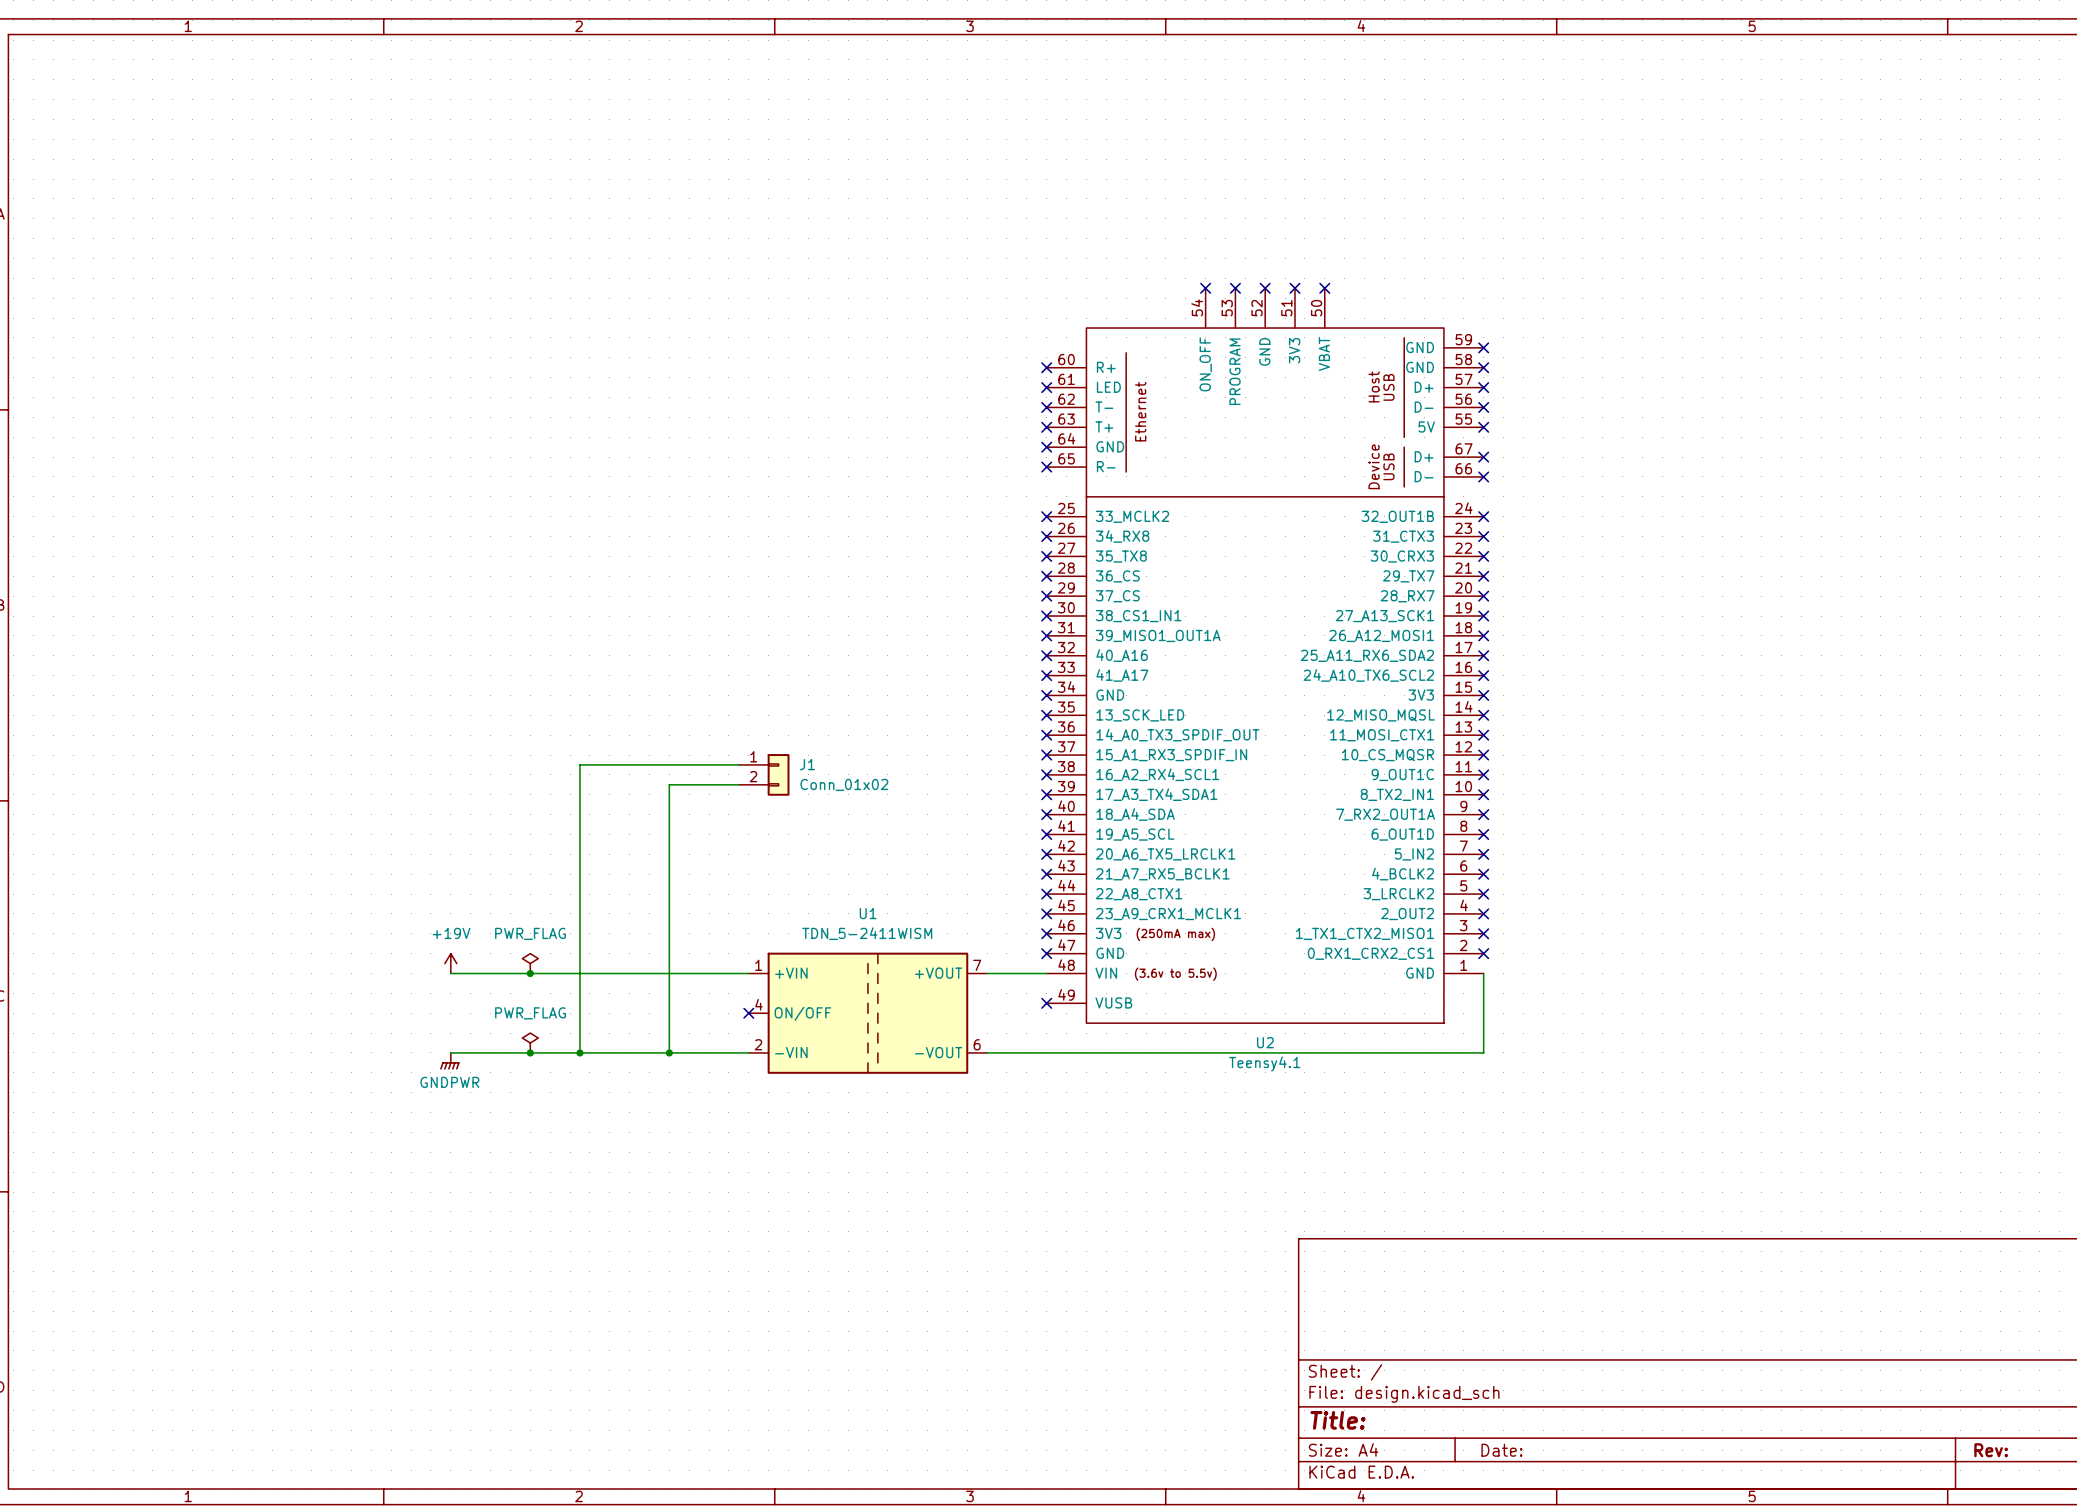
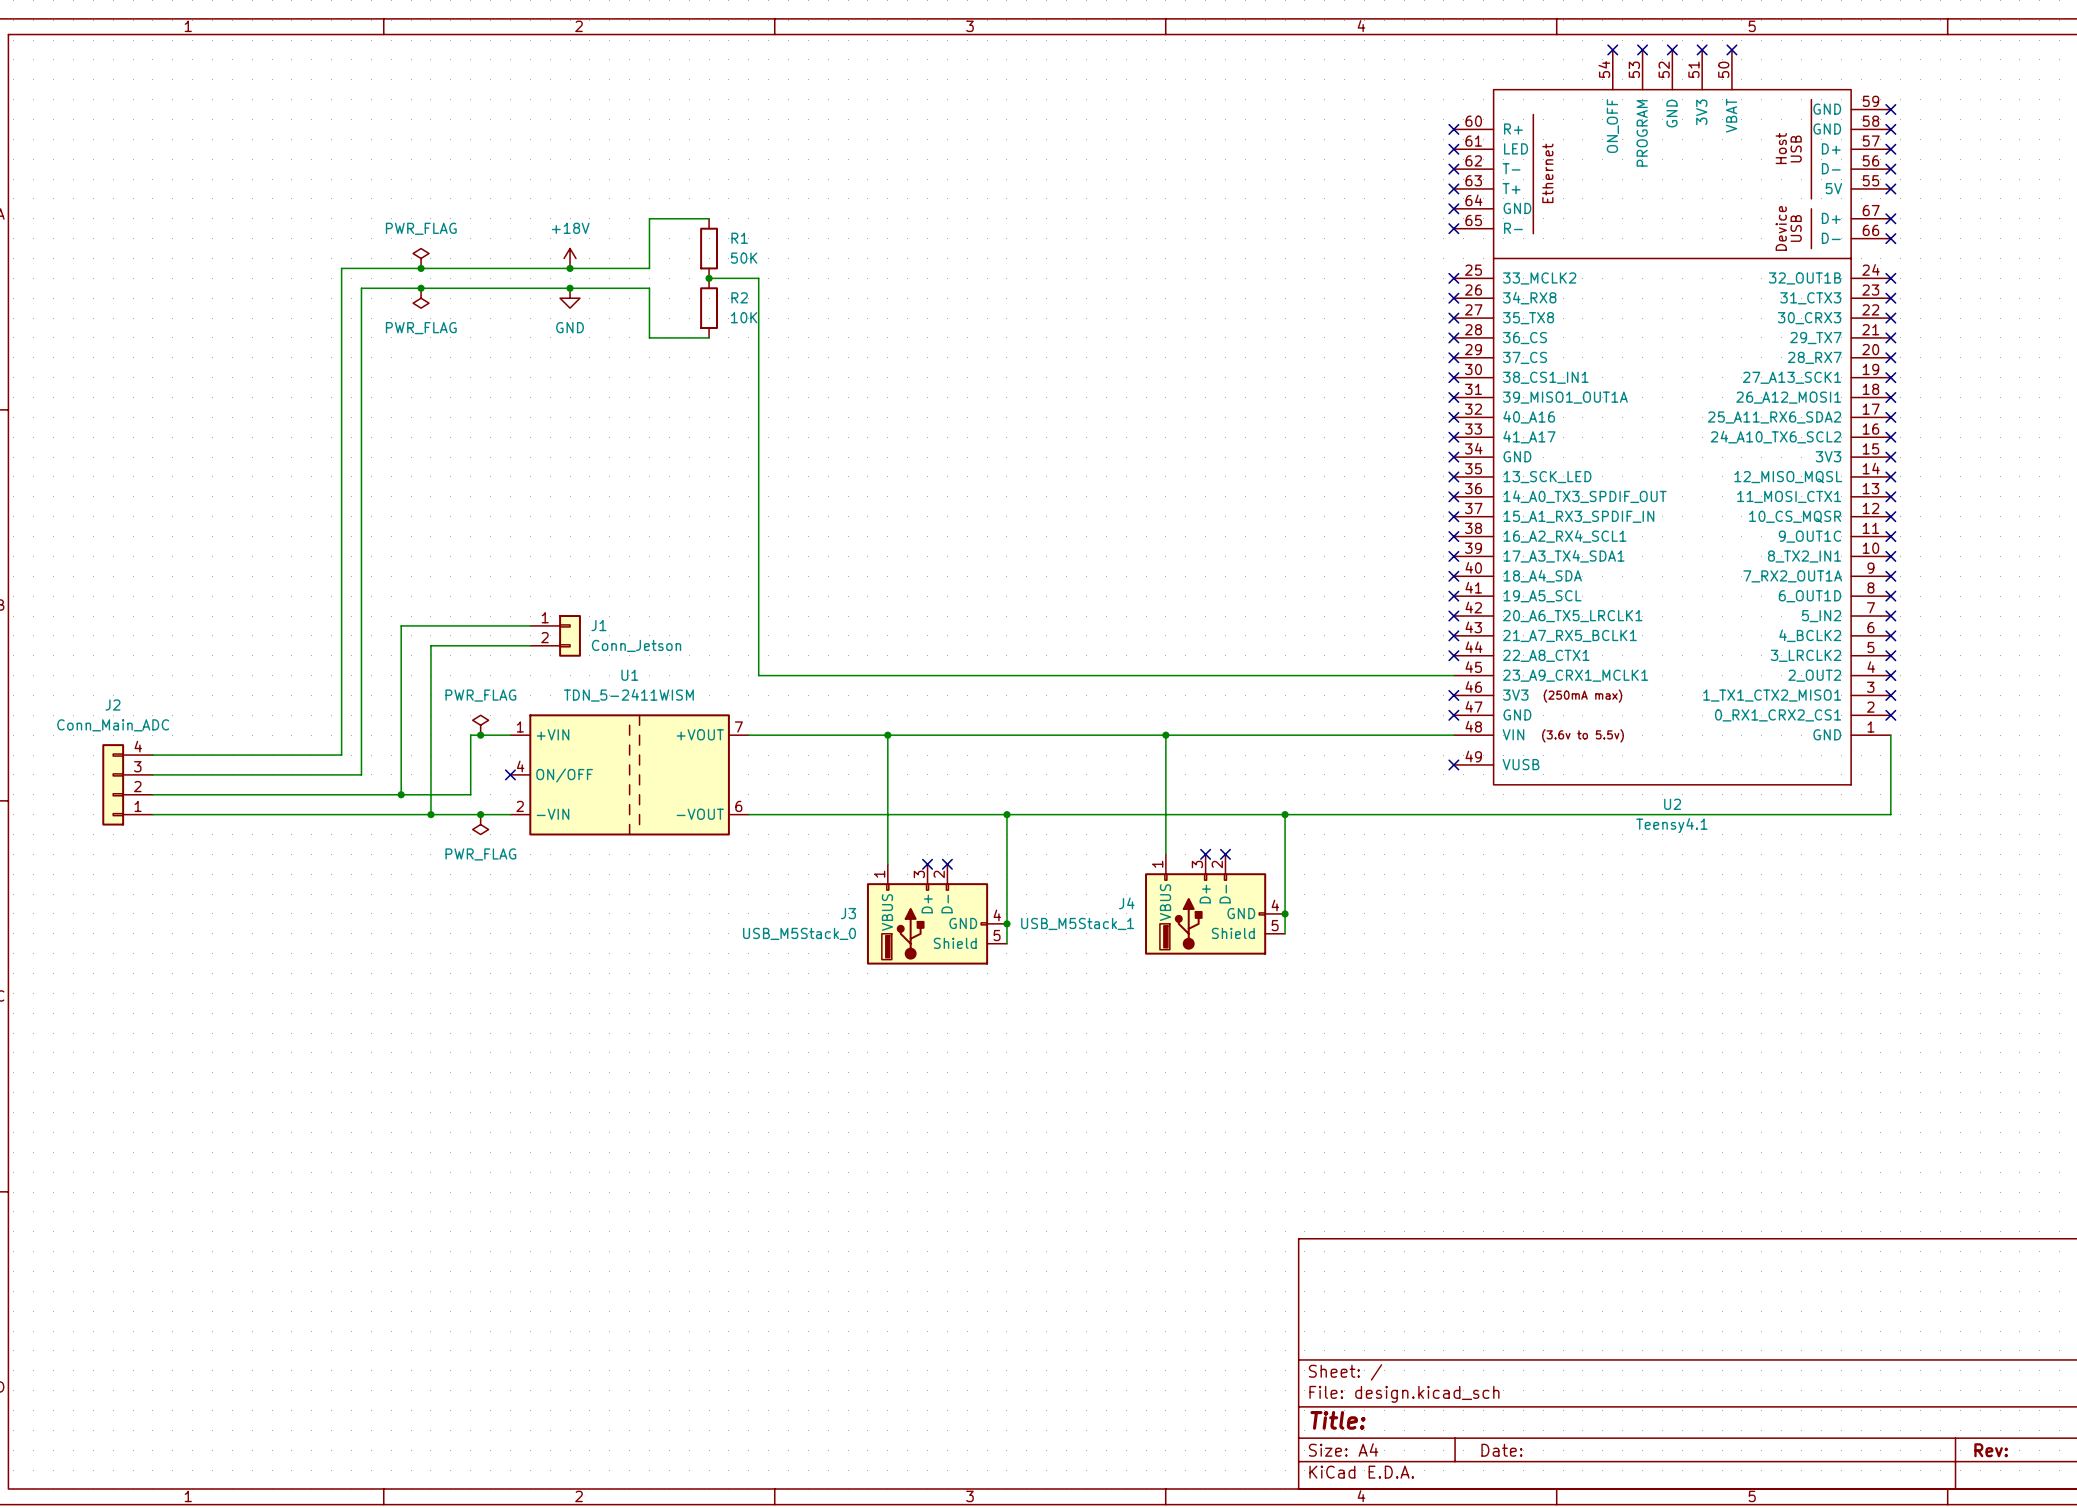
no-connect mark: none -> (1612, 49)
no-connect mark: none -> (1642, 49)
no-connect mark: none -> (1672, 49)
no-connect mark: none -> (1702, 49)
no-connect mark: none -> (1731, 49)
no-connect mark: none -> (1890, 109)
no-connect mark: none -> (1453, 129)
no-connect mark: none -> (1890, 129)
no-connect mark: none -> (1453, 149)
no-connect mark: none -> (1890, 149)
no-connect mark: none -> (1453, 169)
no-connect mark: none -> (1890, 169)
no-connect mark: none -> (1453, 188)
no-connect mark: none -> (1890, 188)
no-connect mark: none -> (1453, 208)
wire: none -> (709, 218) (649, 218) (649, 268) (341, 268) (341, 755) (152, 755)
no-connect mark: none -> (1890, 218)
no-connect mark: none -> (1453, 228)
no-connect mark: none -> (1890, 238)
R1: none -> 50K (709, 248)
power symbol: none -> PWR_FLAG (421, 258)
power symbol: none -> +18V (570, 258)
junction: none -> (421, 268)
junction: none -> (570, 268)
wire: none -> (709, 278) (758, 278) (758, 675) (1453, 675)
junction: none -> (709, 278)
no-connect mark: none -> (1453, 278)
no-connect mark: none -> (1890, 278)
junction: none -> (421, 288)
junction: none -> (570, 288)
no-connect mark: (1205, 288) -> none
no-connect mark: (1235, 288) -> none
no-connect mark: (1265, 288) -> none
no-connect mark: (1294, 288) -> none
no-connect mark: (1324, 288) -> none
power symbol: none -> PWR_FLAG (421, 298)
power symbol: none -> GND (570, 298)
no-connect mark: none -> (1453, 298)
no-connect mark: none -> (1890, 298)
R2: none -> 10K (709, 308)
no-connect mark: none -> (1453, 318)
no-connect mark: none -> (1890, 318)
wire: none -> (709, 337) (649, 337) (649, 288) (361, 288) (361, 774) (152, 774)
no-connect mark: none -> (1453, 337)
no-connect mark: none -> (1890, 337)
no-connect mark: (1483, 347) -> none
no-connect mark: none -> (1453, 357)
no-connect mark: none -> (1890, 357)
no-connect mark: (1046, 367) -> none
no-connect mark: (1483, 367) -> none
no-connect mark: none -> (1453, 377)
no-connect mark: none -> (1890, 377)
no-connect mark: (1046, 387) -> none
no-connect mark: (1483, 387) -> none
no-connect mark: none -> (1453, 397)
no-connect mark: none -> (1890, 397)
no-connect mark: (1046, 407) -> none
no-connect mark: (1483, 407) -> none
no-connect mark: none -> (1453, 417)
no-connect mark: none -> (1890, 417)
no-connect mark: (1046, 427) -> none
no-connect mark: (1483, 427) -> none
no-connect mark: none -> (1453, 437)
no-connect mark: none -> (1890, 437)
no-connect mark: (1046, 447) -> none
no-connect mark: none -> (1453, 457)
no-connect mark: (1483, 457) -> none
no-connect mark: none -> (1890, 457)
no-connect mark: (1046, 467) -> none
no-connect mark: none -> (1453, 476)
no-connect mark: (1483, 476) -> none
no-connect mark: none -> (1890, 476)
no-connect mark: none -> (1453, 496)
no-connect mark: none -> (1890, 496)
no-connect mark: (1046, 516) -> none
no-connect mark: none -> (1453, 516)
no-connect mark: (1483, 516) -> none
no-connect mark: none -> (1890, 516)
no-connect mark: (1046, 536) -> none
no-connect mark: none -> (1453, 536)
no-connect mark: (1483, 536) -> none
no-connect mark: none -> (1890, 536)
no-connect mark: (1046, 556) -> none
no-connect mark: none -> (1453, 556)
no-connect mark: (1483, 556) -> none
no-connect mark: none -> (1890, 556)
no-connect mark: (1046, 576) -> none
no-connect mark: none -> (1453, 576)
no-connect mark: (1483, 576) -> none
no-connect mark: none -> (1890, 576)
no-connect mark: (1046, 596) -> none
no-connect mark: none -> (1453, 596)
no-connect mark: (1483, 596) -> none
no-connect mark: none -> (1890, 596)
no-connect mark: (1046, 616) -> none
no-connect mark: none -> (1453, 616)
no-connect mark: (1483, 616) -> none
no-connect mark: none -> (1890, 616)
wire: none -> (530, 625) (401, 625) (401, 794)
no-connect mark: (1046, 635) -> none
no-connect mark: none -> (1453, 635)
no-connect mark: (1483, 635) -> none
no-connect mark: none -> (1890, 635)
wire: none -> (530, 645) (430, 645) (430, 814)
no-connect mark: (1046, 655) -> none
U2 position: (1265, 655) -> (1672, 417)
no-connect mark: none -> (1453, 655)
no-connect mark: (1483, 655) -> none
no-connect mark: none -> (1890, 655)
no-connect mark: (1046, 675) -> none
no-connect mark: (1483, 675) -> none
no-connect mark: none -> (1890, 675)
no-connect mark: (1046, 695) -> none
no-connect mark: none -> (1453, 695)
no-connect mark: (1483, 695) -> none
no-connect mark: none -> (1890, 695)
no-connect mark: (1046, 715) -> none
no-connect mark: none -> (1453, 715)
no-connect mark: (1483, 715) -> none
no-connect mark: none -> (1890, 715)
power symbol: none -> PWR_FLAG (480, 725)
junction: none -> (480, 735)
wire: none -> (510, 735) (470, 735) (470, 794) (152, 794)
wire: none -> (748, 735) (1453, 735)
wire: none -> (887, 735) (887, 864)
junction: none -> (887, 735)
no-connect mark: (1046, 735) -> none
wire: none -> (1165, 735) (1165, 854)
junction: none -> (1165, 735)
no-connect mark: (1483, 735) -> none
wire: none -> (1890, 735) (1890, 814) (748, 814)
no-connect mark: (1046, 755) -> none
no-connect mark: (1483, 755) -> none
wire: (738, 764) (579, 764) (579, 1052) -> none
no-connect mark: none -> (1453, 764)
no-connect mark: none -> (510, 774)
J1 position: (764, 774) -> (555, 635)
no-connect mark: (1046, 774) -> none
no-connect mark: (1483, 774) -> none
J2: none -> Conn_Main_ADC (127, 784)
wire: (738, 784) (669, 784) (669, 1052) -> none
J1 value: Conn_01x02 (844, 784) -> Conn_Jetson (636, 645)
junction: none -> (401, 794)
no-connect mark: (1046, 794) -> none
no-connect mark: (1483, 794) -> none
wire: none -> (152, 814) (510, 814)
junction: none -> (430, 814)
junction: none -> (480, 814)
wire: none -> (1006, 814) (1006, 943)
junction: none -> (1006, 814)
no-connect mark: (1046, 814) -> none
wire: none -> (1285, 814) (1285, 933)
junction: none -> (1285, 814)
no-connect mark: (1483, 814) -> none
power symbol: none -> PWR_FLAG (480, 824)
no-connect mark: (1046, 834) -> none
no-connect mark: (1483, 834) -> none
no-connect mark: (1046, 854) -> none
no-connect mark: none -> (1205, 854)
no-connect mark: none -> (1225, 854)
no-connect mark: (1483, 854) -> none
no-connect mark: none -> (927, 864)
no-connect mark: none -> (947, 864)
no-connect mark: (1046, 874) -> none
no-connect mark: (1483, 874) -> none
no-connect mark: (1046, 894) -> none
no-connect mark: (1483, 894) -> none
J4: none -> USB_M5Stack_1 (1215, 904)
no-connect mark: (1046, 913) -> none
junction: none -> (1285, 913)
no-connect mark: (1483, 913) -> none
J3: none -> USB_M5Stack_0 (936, 914)
junction: none -> (1006, 923)
no-connect mark: (1046, 933) -> none
no-connect mark: (1483, 933) -> none
no-connect mark: (1046, 953) -> none
no-connect mark: (1483, 953) -> none
power symbol: +19V (450, 963) -> none
power symbol: PWR_FLAG (530, 963) -> none
wire: (450, 973) (748, 973) -> none
junction: (530, 973) -> none
wire: (987, 973) (1046, 973) -> none
wire: (1483, 973) (1483, 1052) (987, 1052) -> none
no-connect mark: (1046, 1003) -> none
no-connect mark: (748, 1013) -> none
U1 position: (867, 1013) -> (629, 774)
power symbol: PWR_FLAG (530, 1043) -> none
wire: (450, 1052) (748, 1052) -> none
junction: (530, 1052) -> none
junction: (579, 1052) -> none
junction: (669, 1052) -> none
power symbol: GNDPWR (449, 1061) -> none

